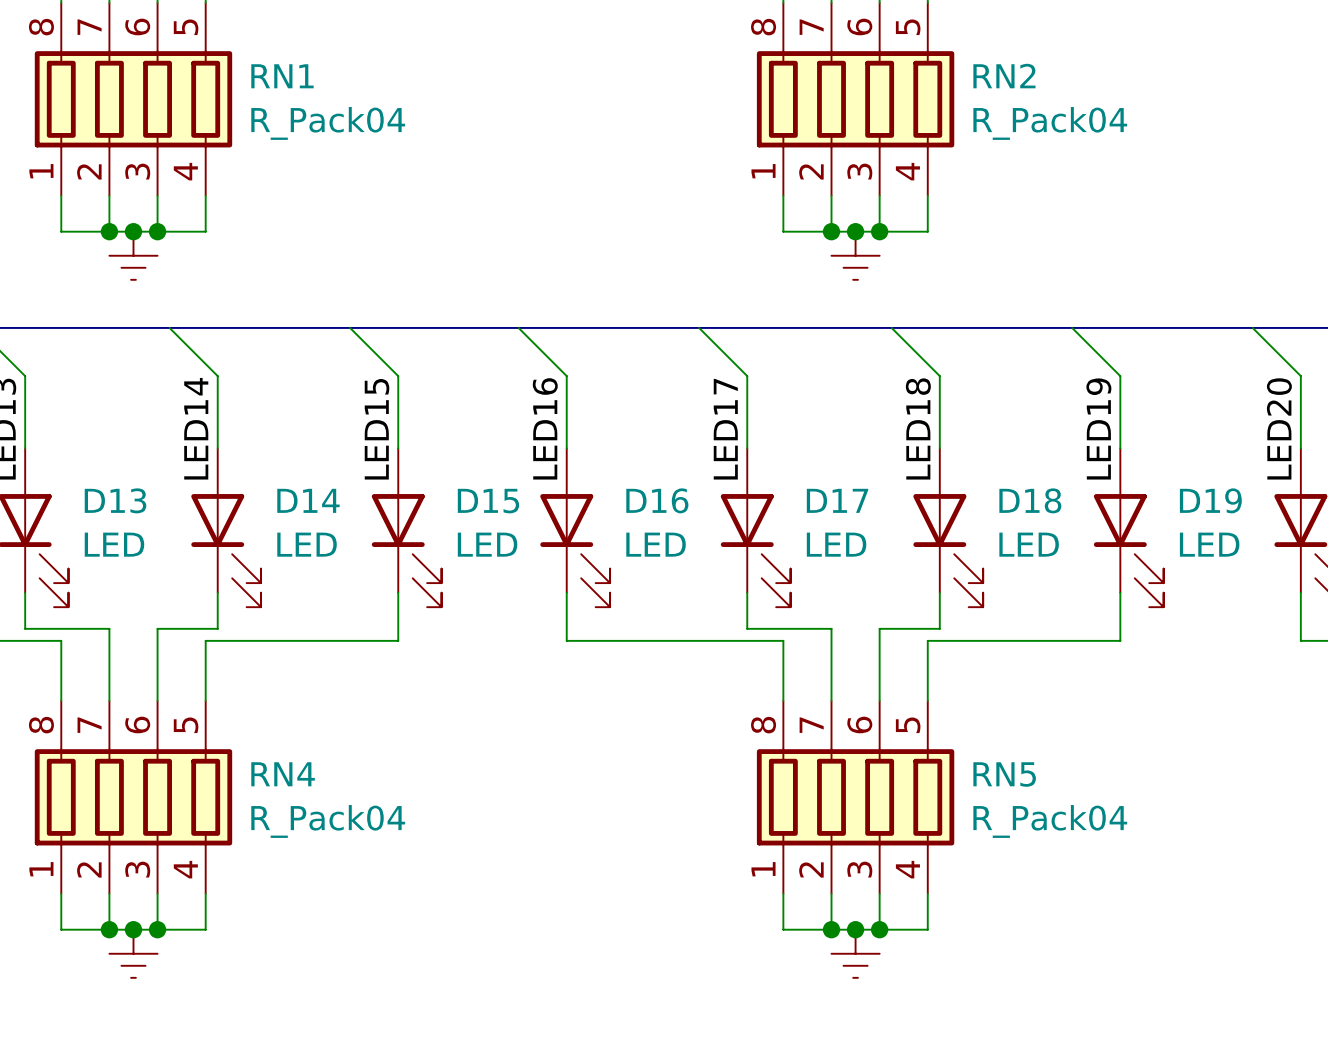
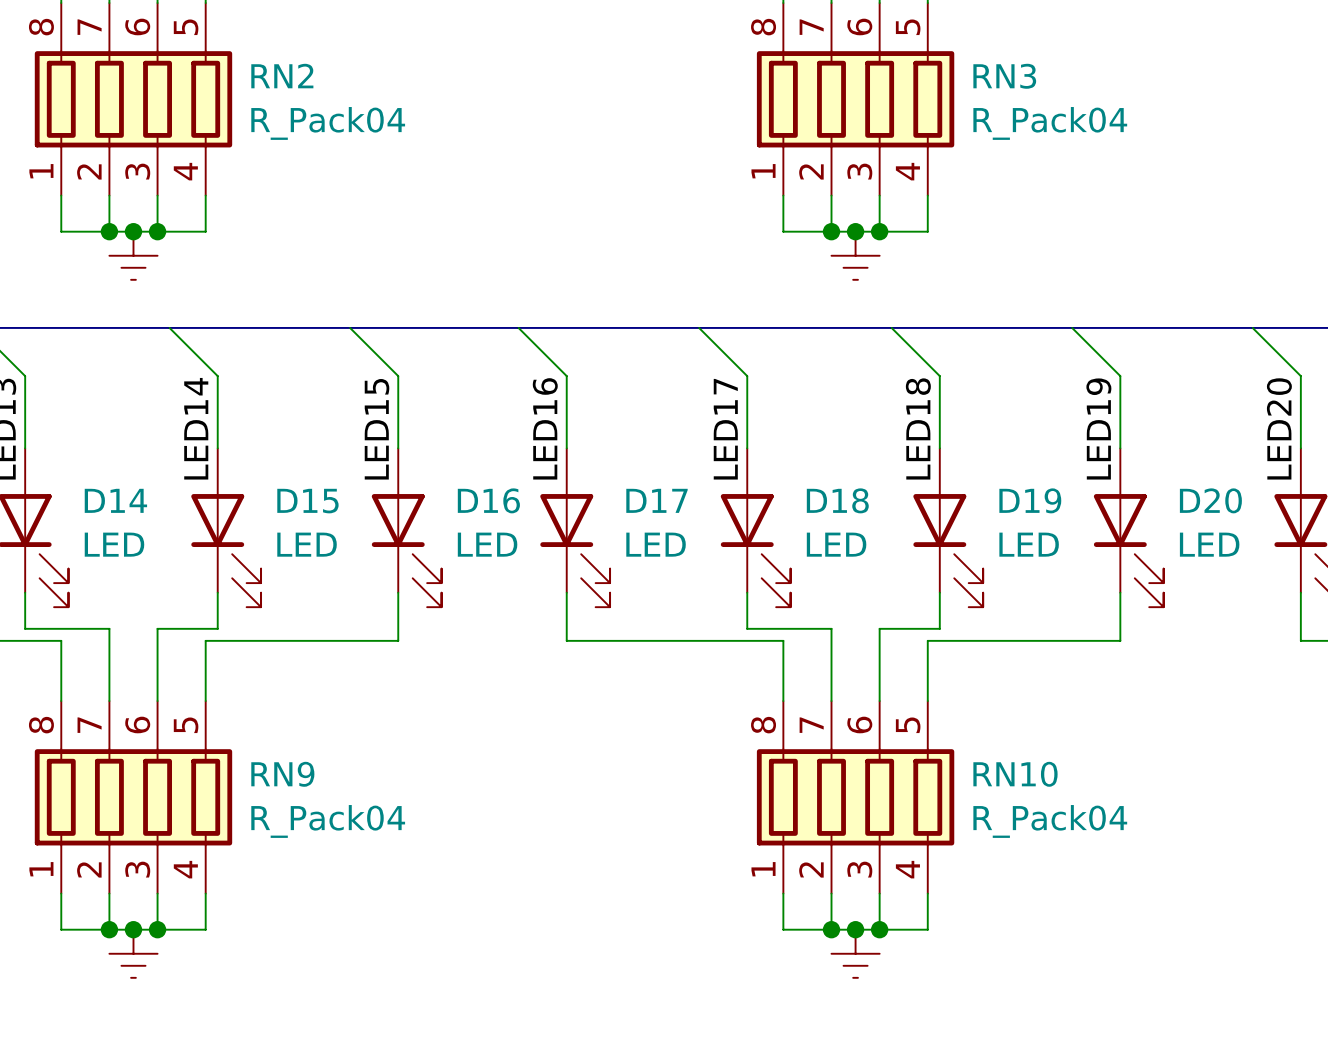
RN1 name: RN1 (282, 76) -> RN2 (282, 76)
RN2 name: RN2 (1004, 76) -> RN3 (1004, 76)
D13 name: D13 (115, 500) -> D14 (115, 500)
D14 name: D14 (308, 500) -> D15 (307, 501)
D16 name: D16 (657, 500) -> D17 (656, 500)
D17 name: D17 (837, 500) -> D18 (837, 500)
D18 name: D18 (1030, 500) -> D19 (1030, 500)
D19 name: D19 (1210, 500) -> D20 (1210, 500)
D15 name: D15 (488, 501) -> D16 (488, 500)
RN4 name: RN4 (283, 774) -> RN9 (282, 774)
RN5 name: RN5 (1004, 774) -> RN10 (1015, 774)

